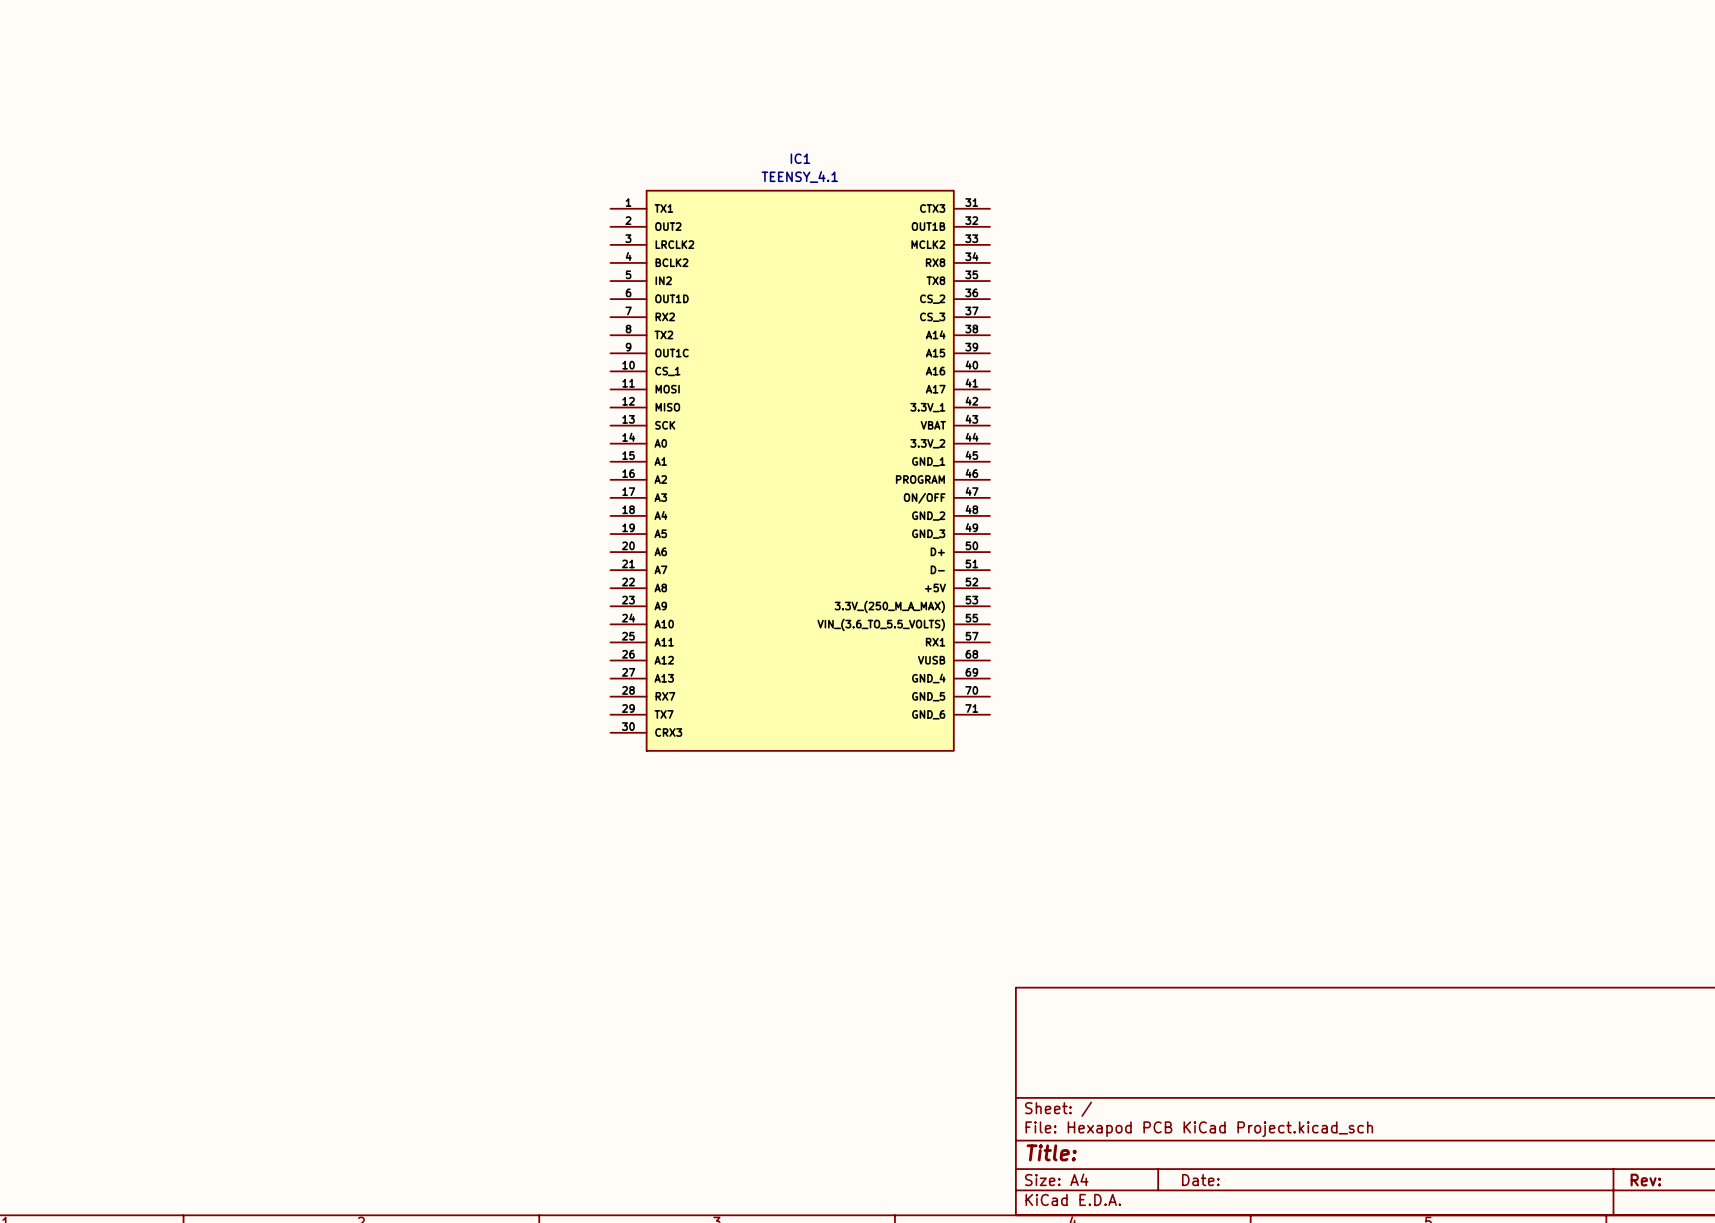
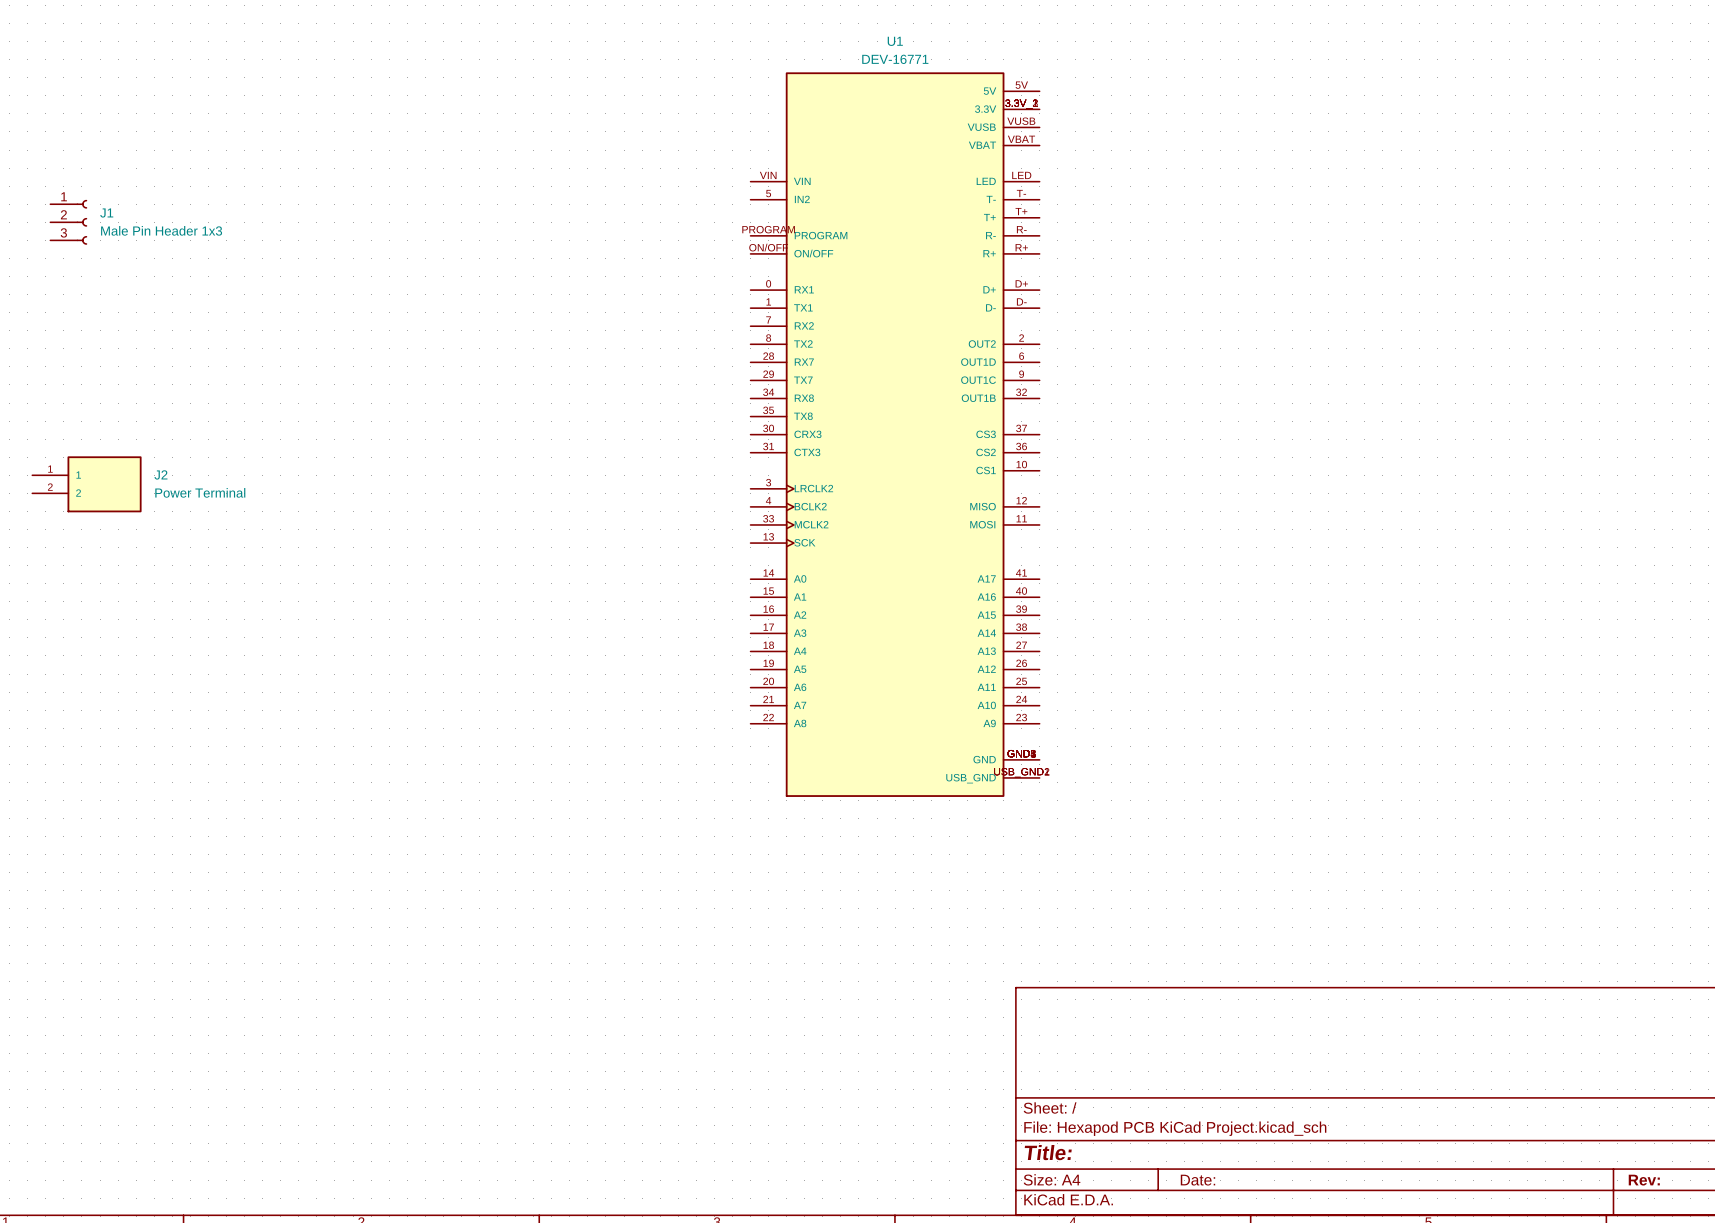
J1: none -> Male Pin Header 1x3 (68, 222)
U1: none -> DEV-16771 (895, 434)
IC1: TEENSY_4.1 (800, 470) -> none
J2: none -> Power Terminal (86, 484)

